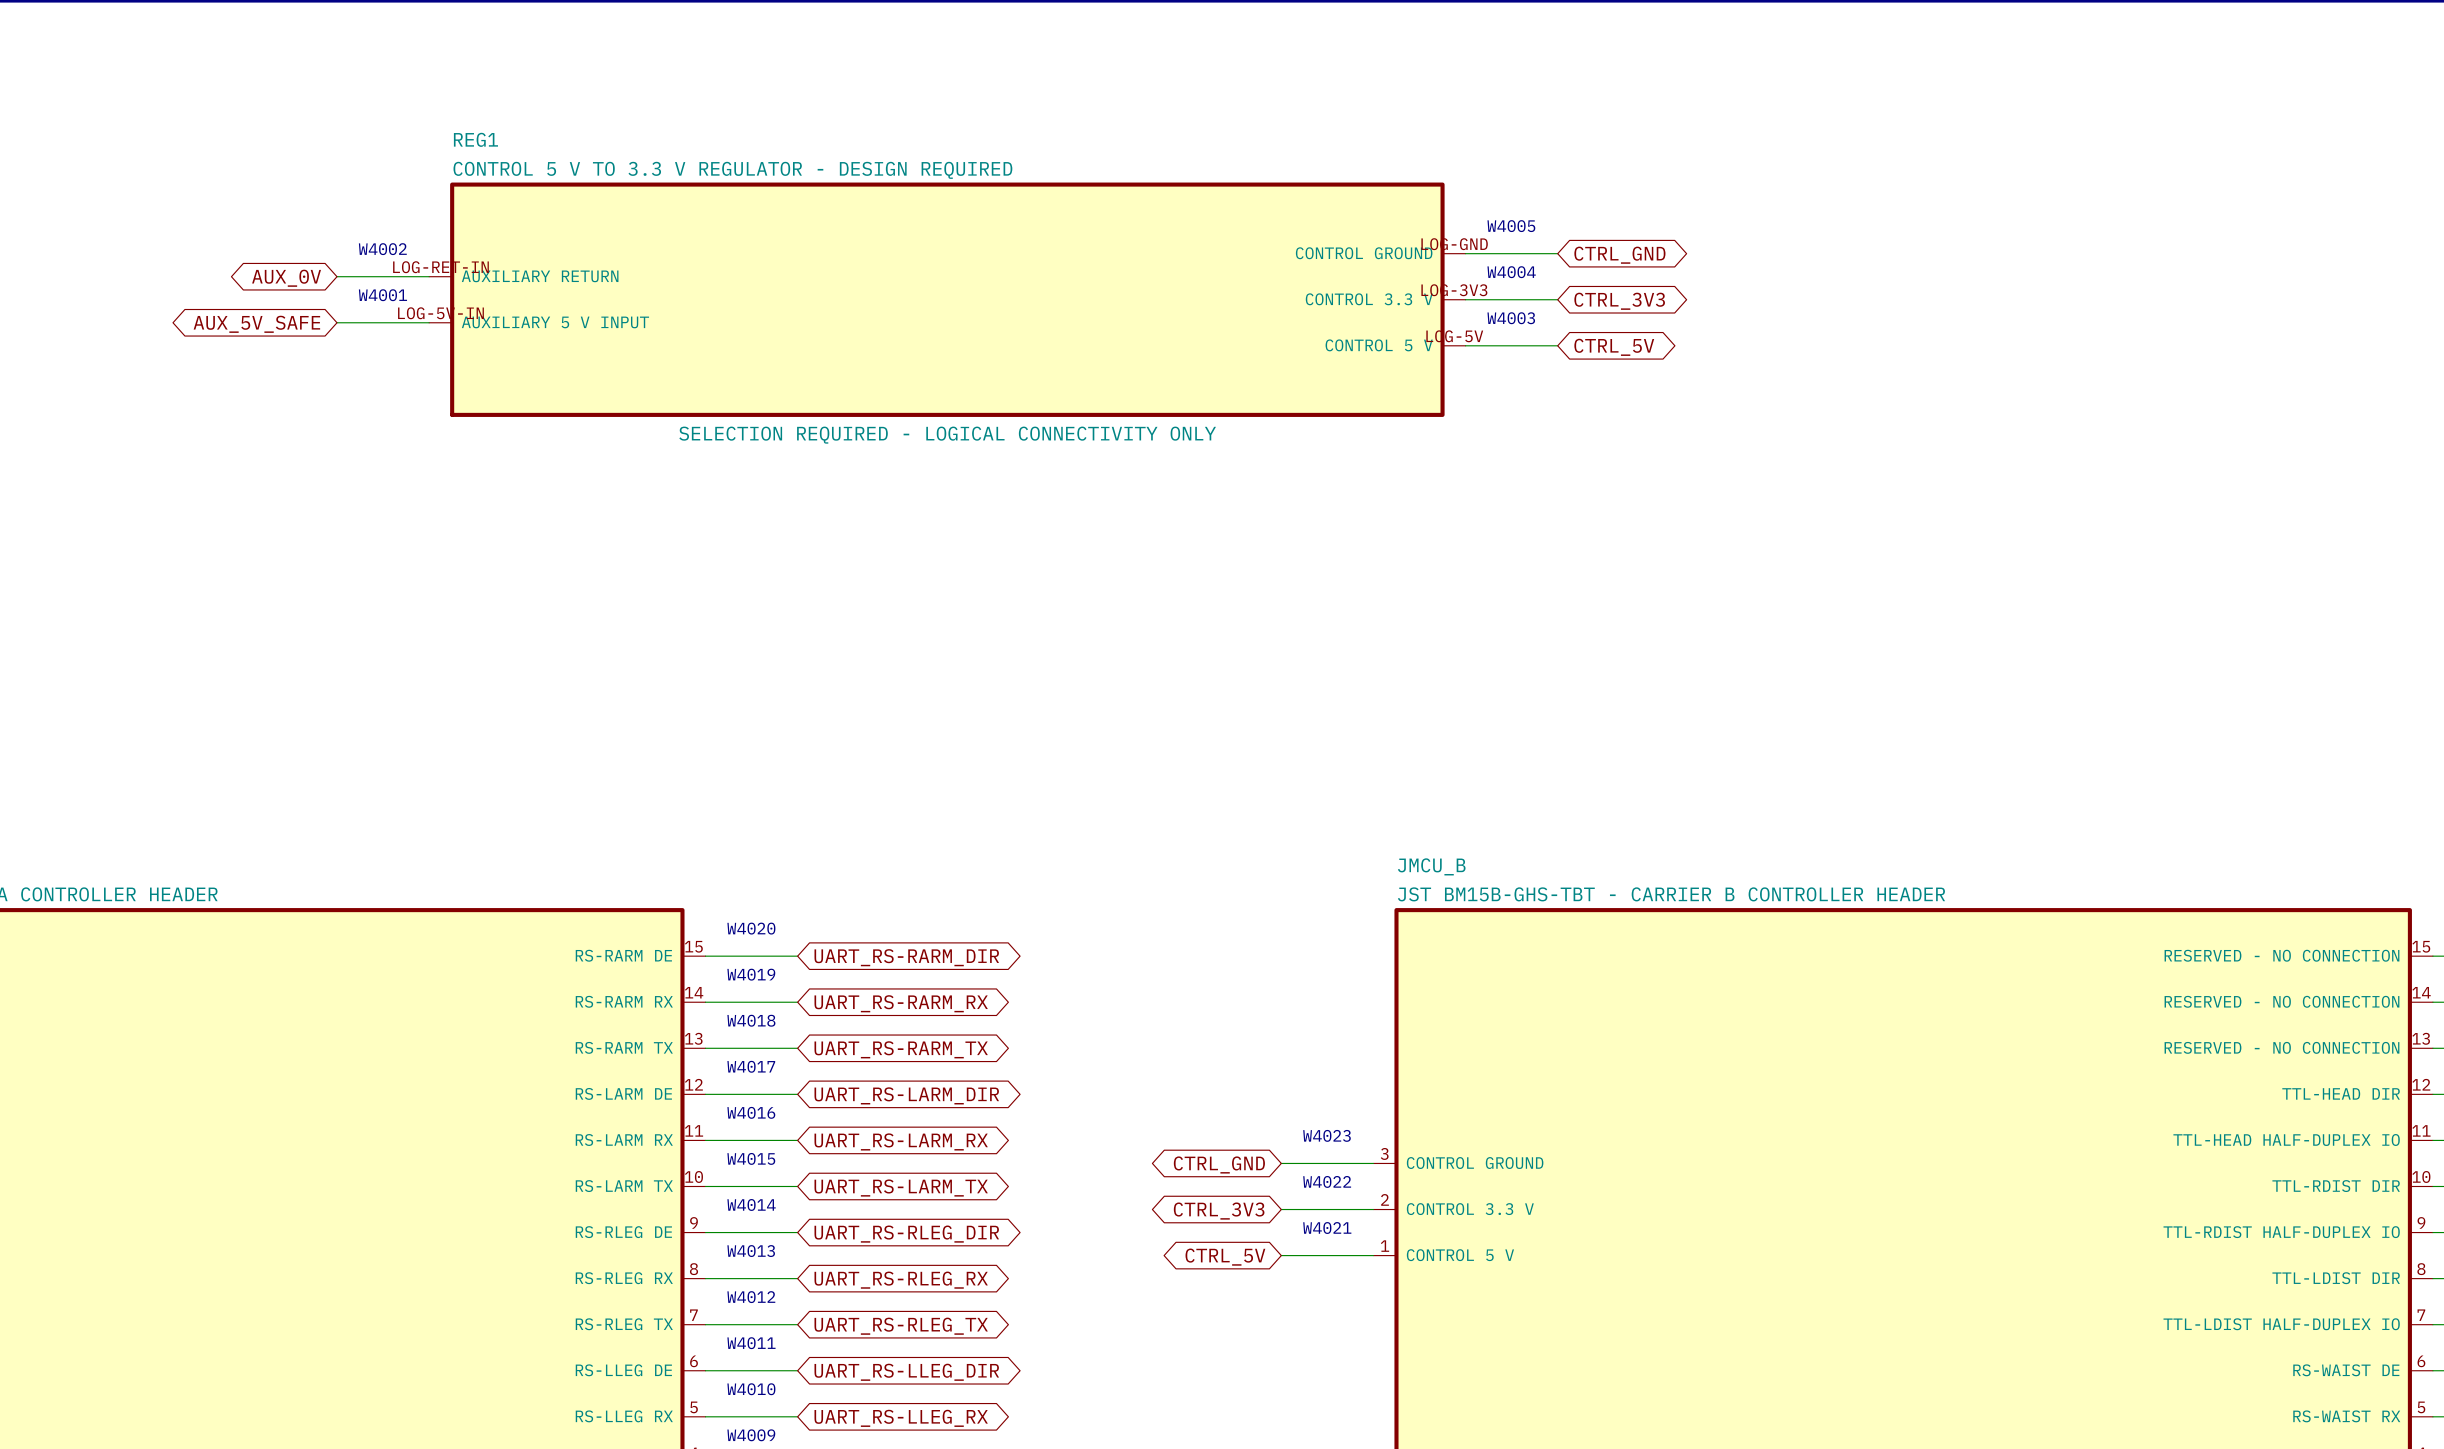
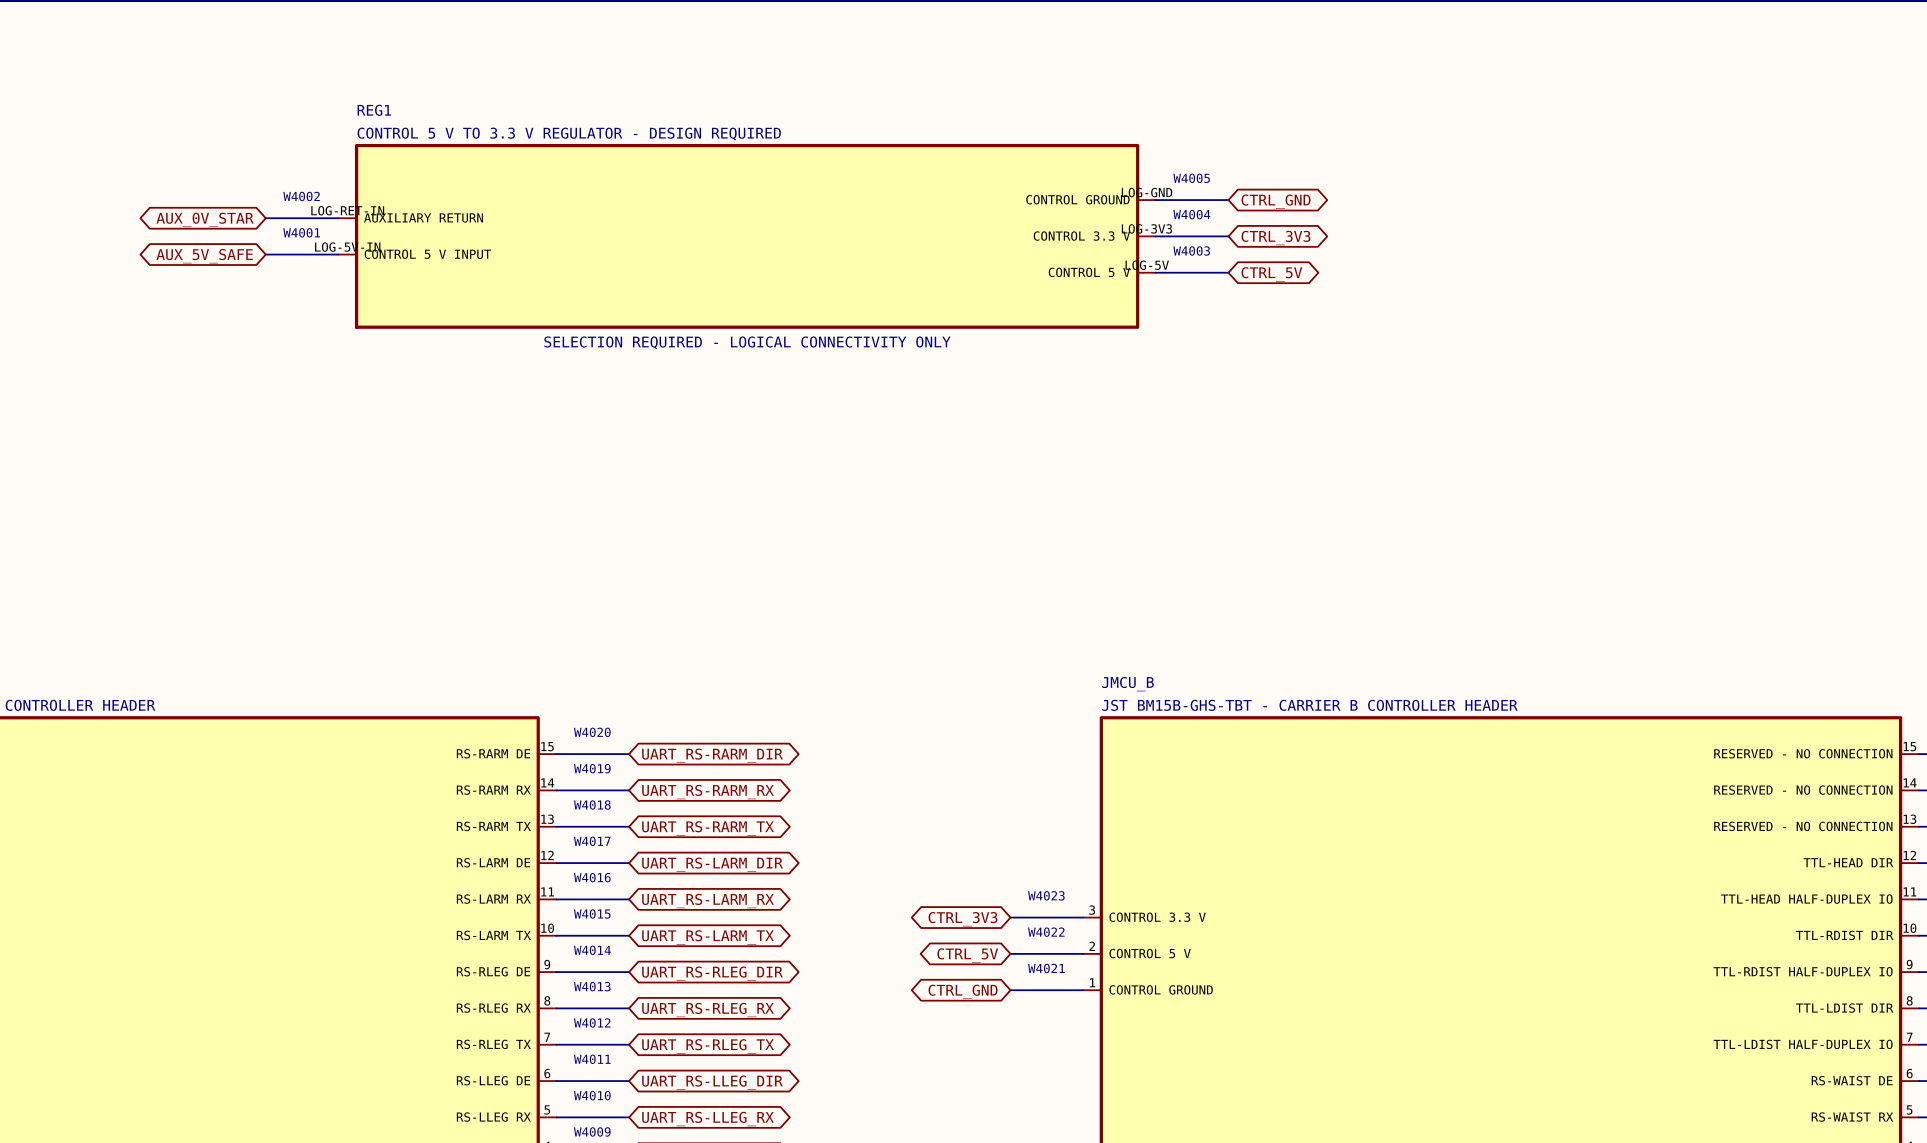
global label: AUX_0V (286, 278) -> AUX_0V_STAR (205, 219)
REG1 pin name: AUXILIARY 5 V INPUT (555, 322) -> CONTROL 5 V INPUT (427, 254)
JMCU_B pin name: CONTROL GROUND (1475, 1163) -> CONTROL 3.3 V (1157, 917)
global label: CTRL_GND (1219, 1164) -> CTRL_3V3 (962, 919)
JMCU_B pin name: CONTROL 3.3 V (1470, 1209) -> CONTROL 5 V (1150, 953)
global label: CTRL_3V3 (1219, 1211) -> CTRL_5V (967, 955)
JMCU_B pin name: CONTROL 5 V (1460, 1255) -> CONTROL GROUND (1161, 989)
global label: CTRL_5V (1225, 1257) -> CTRL_GND (963, 991)

